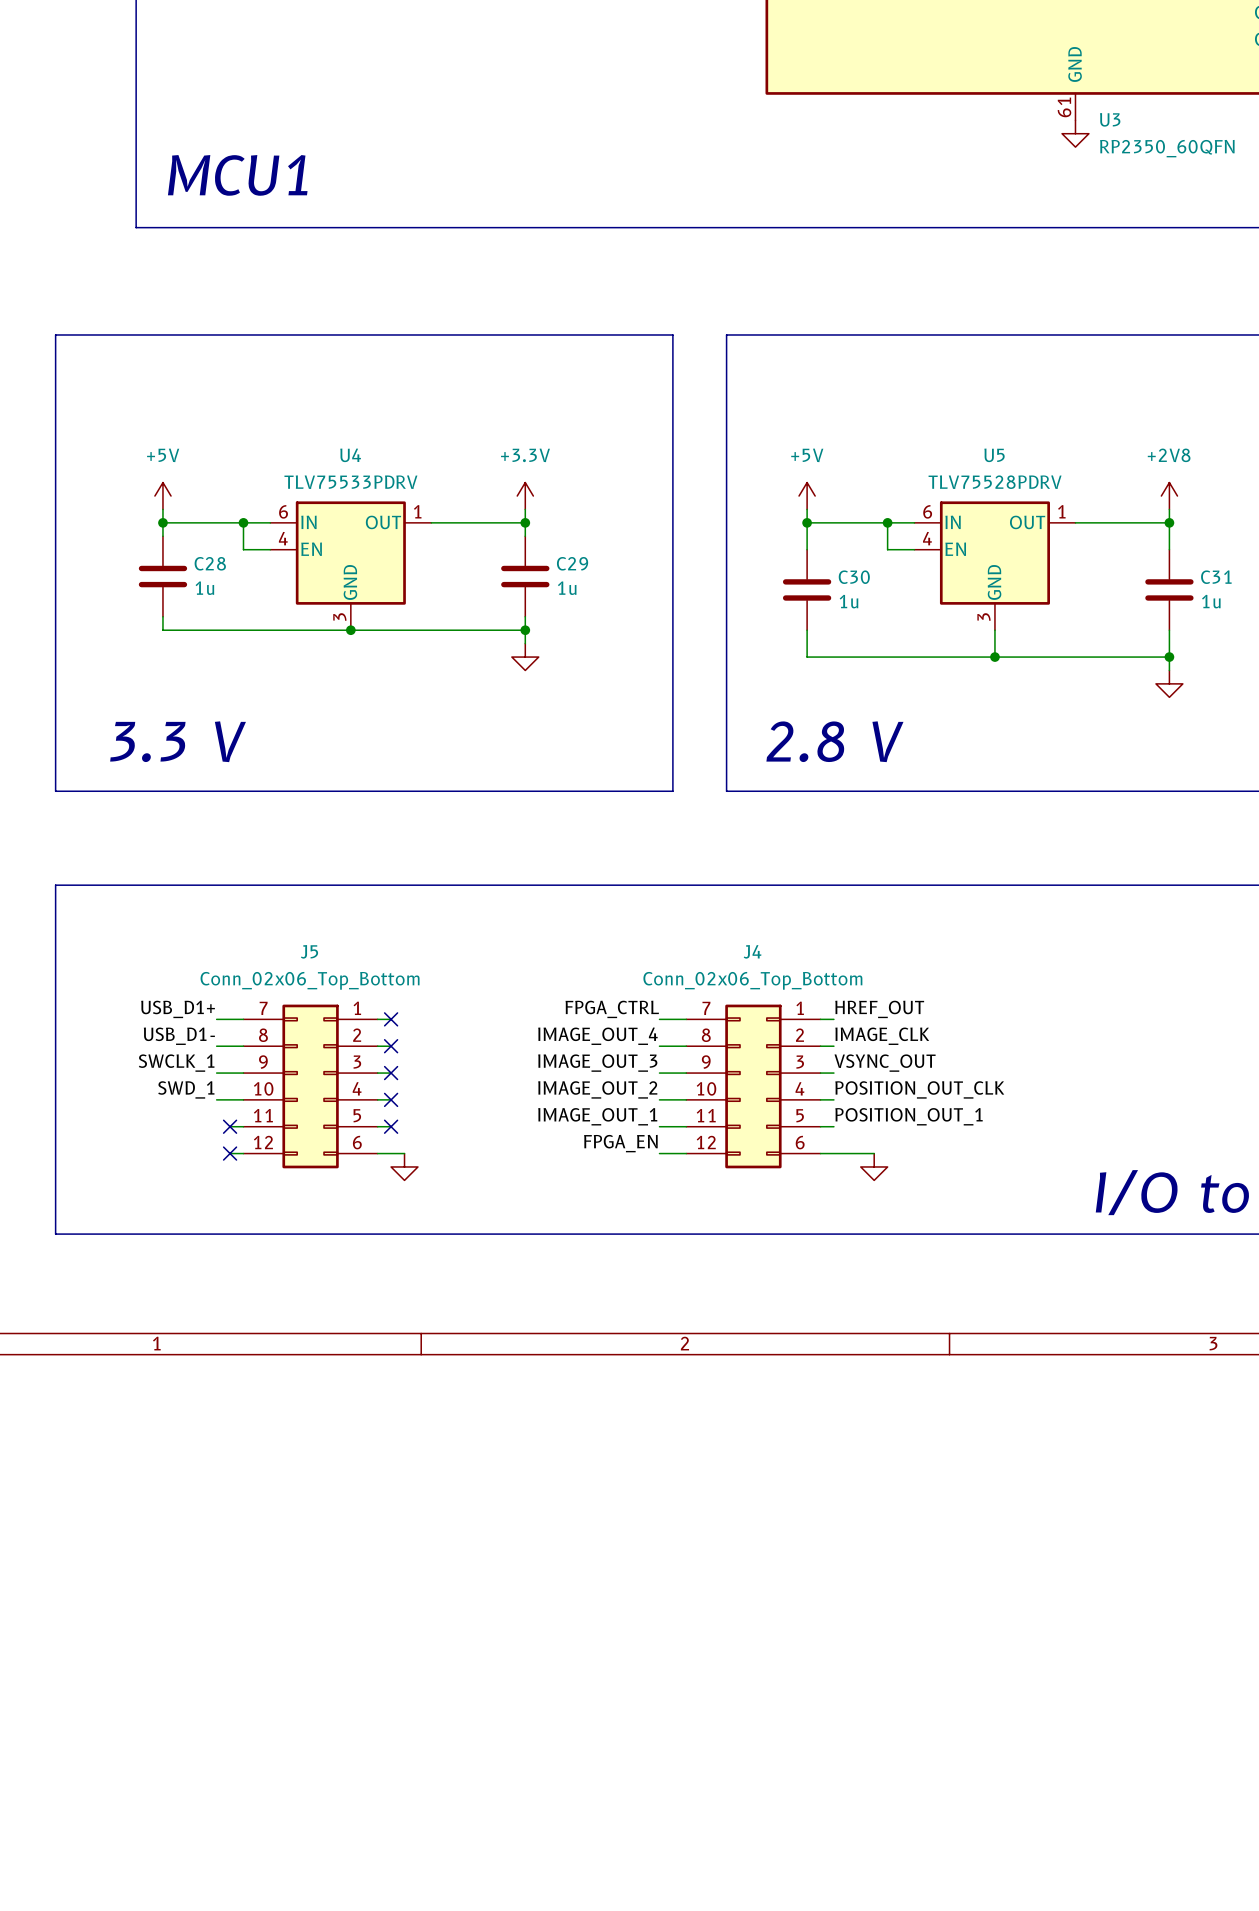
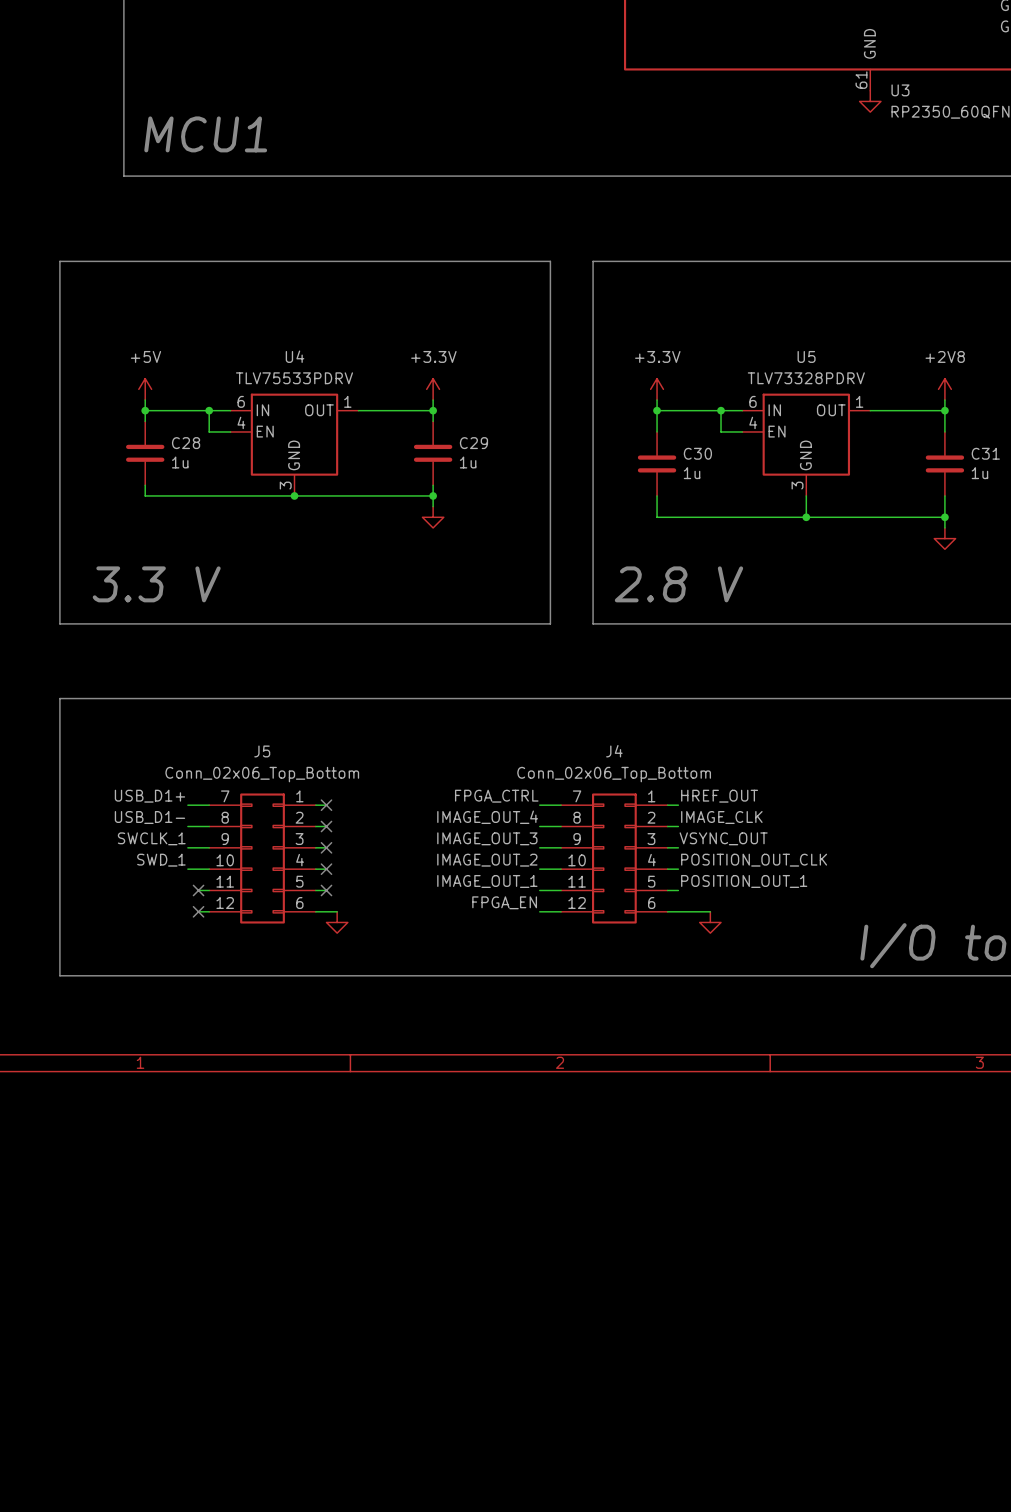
U5 value: TLV75528PDRV (995, 482) -> TLV73328PDRV (806, 378)
power symbol: +5V (807, 496) -> +3.3V (657, 389)

